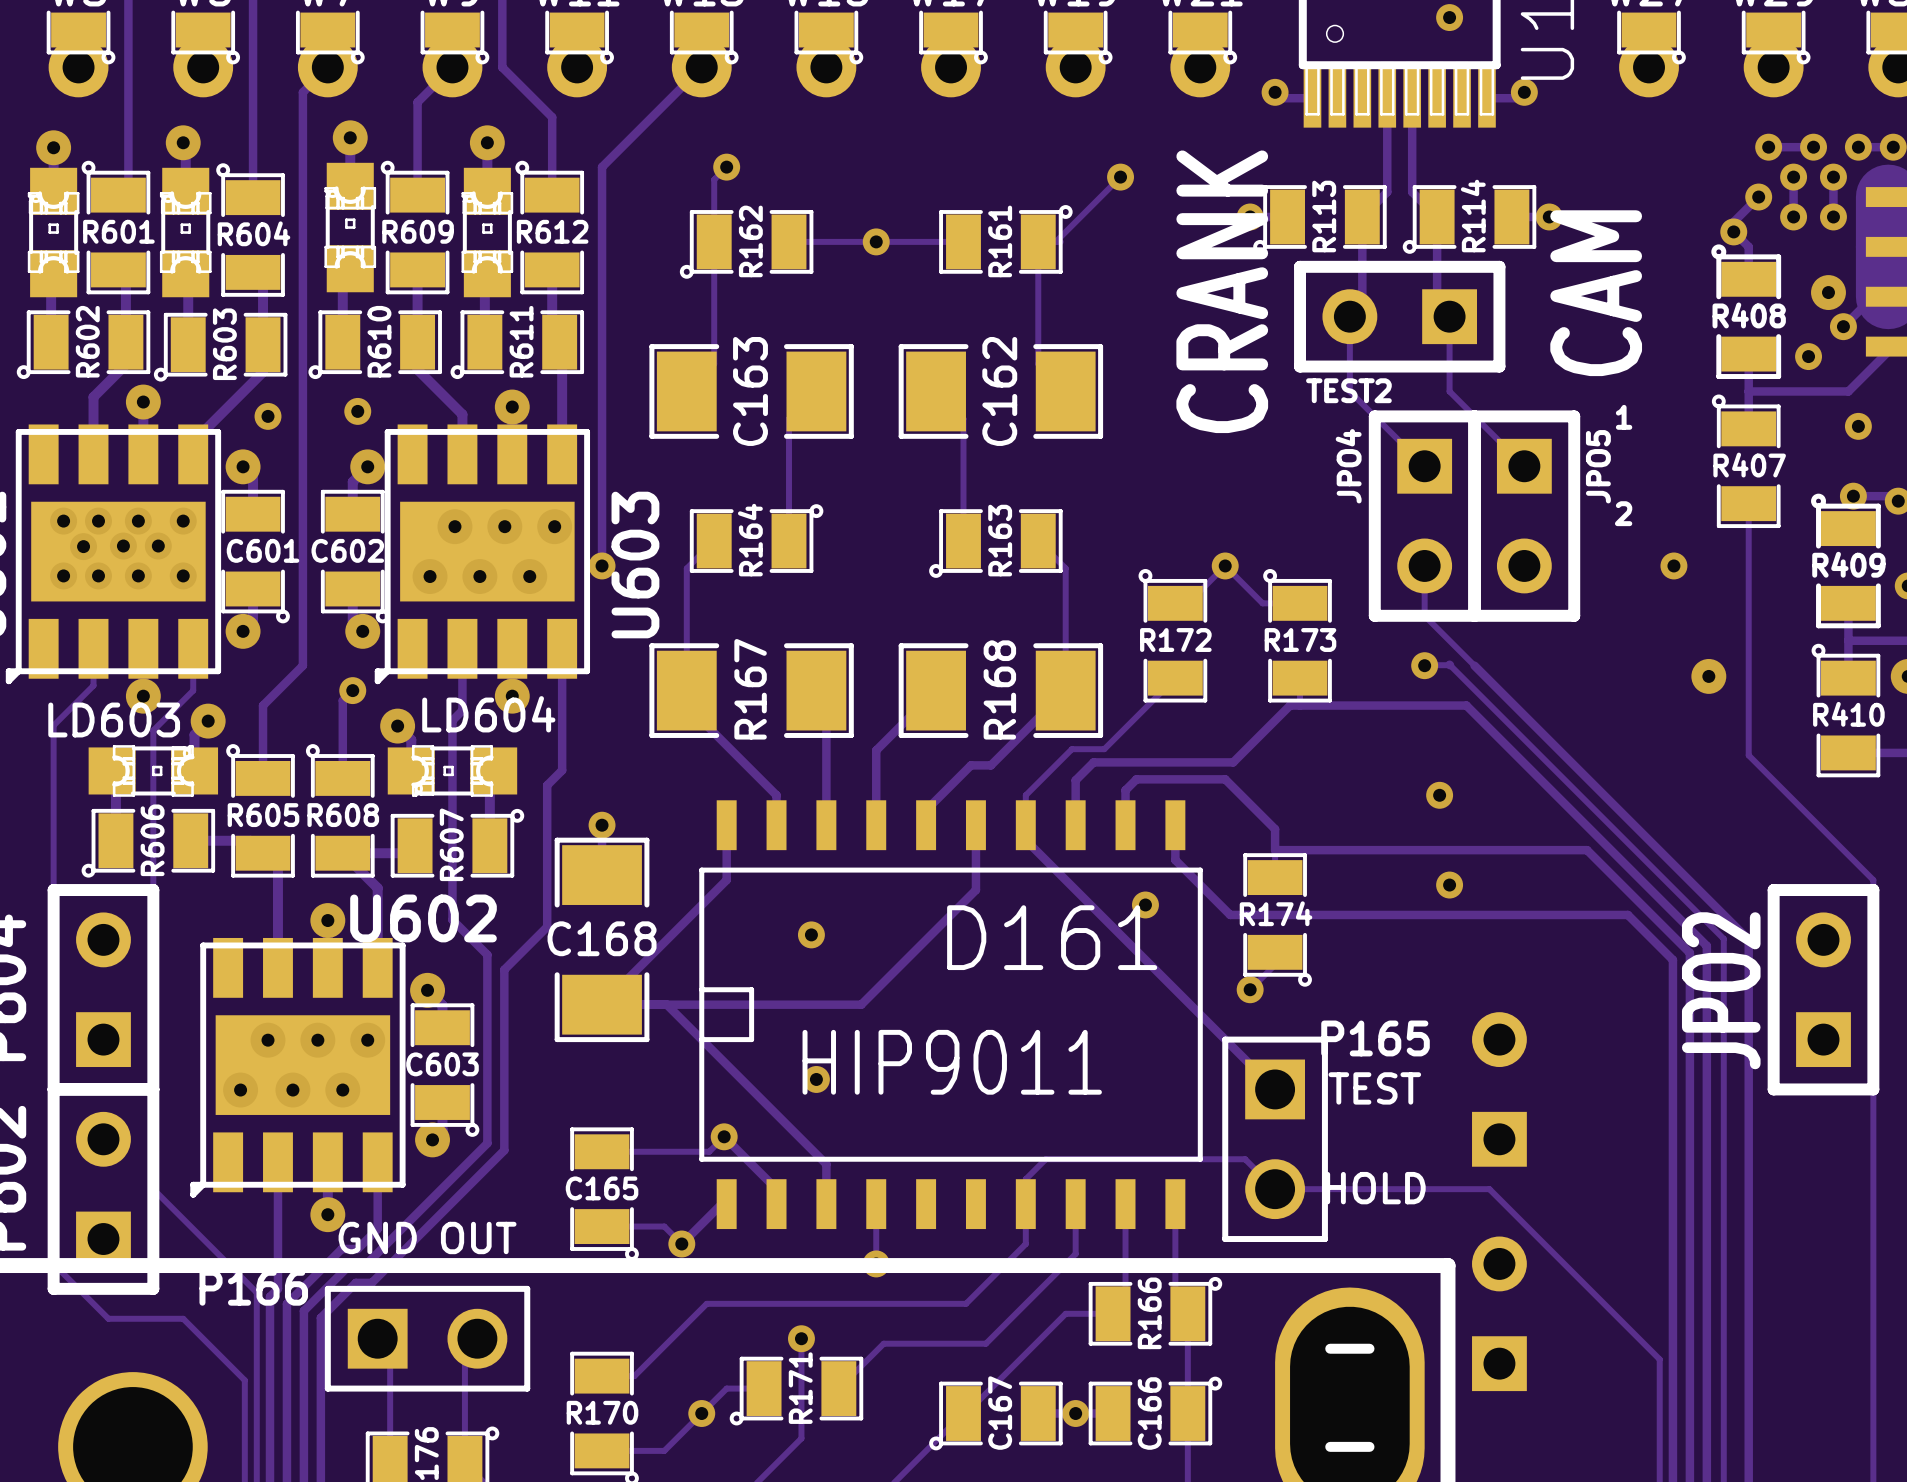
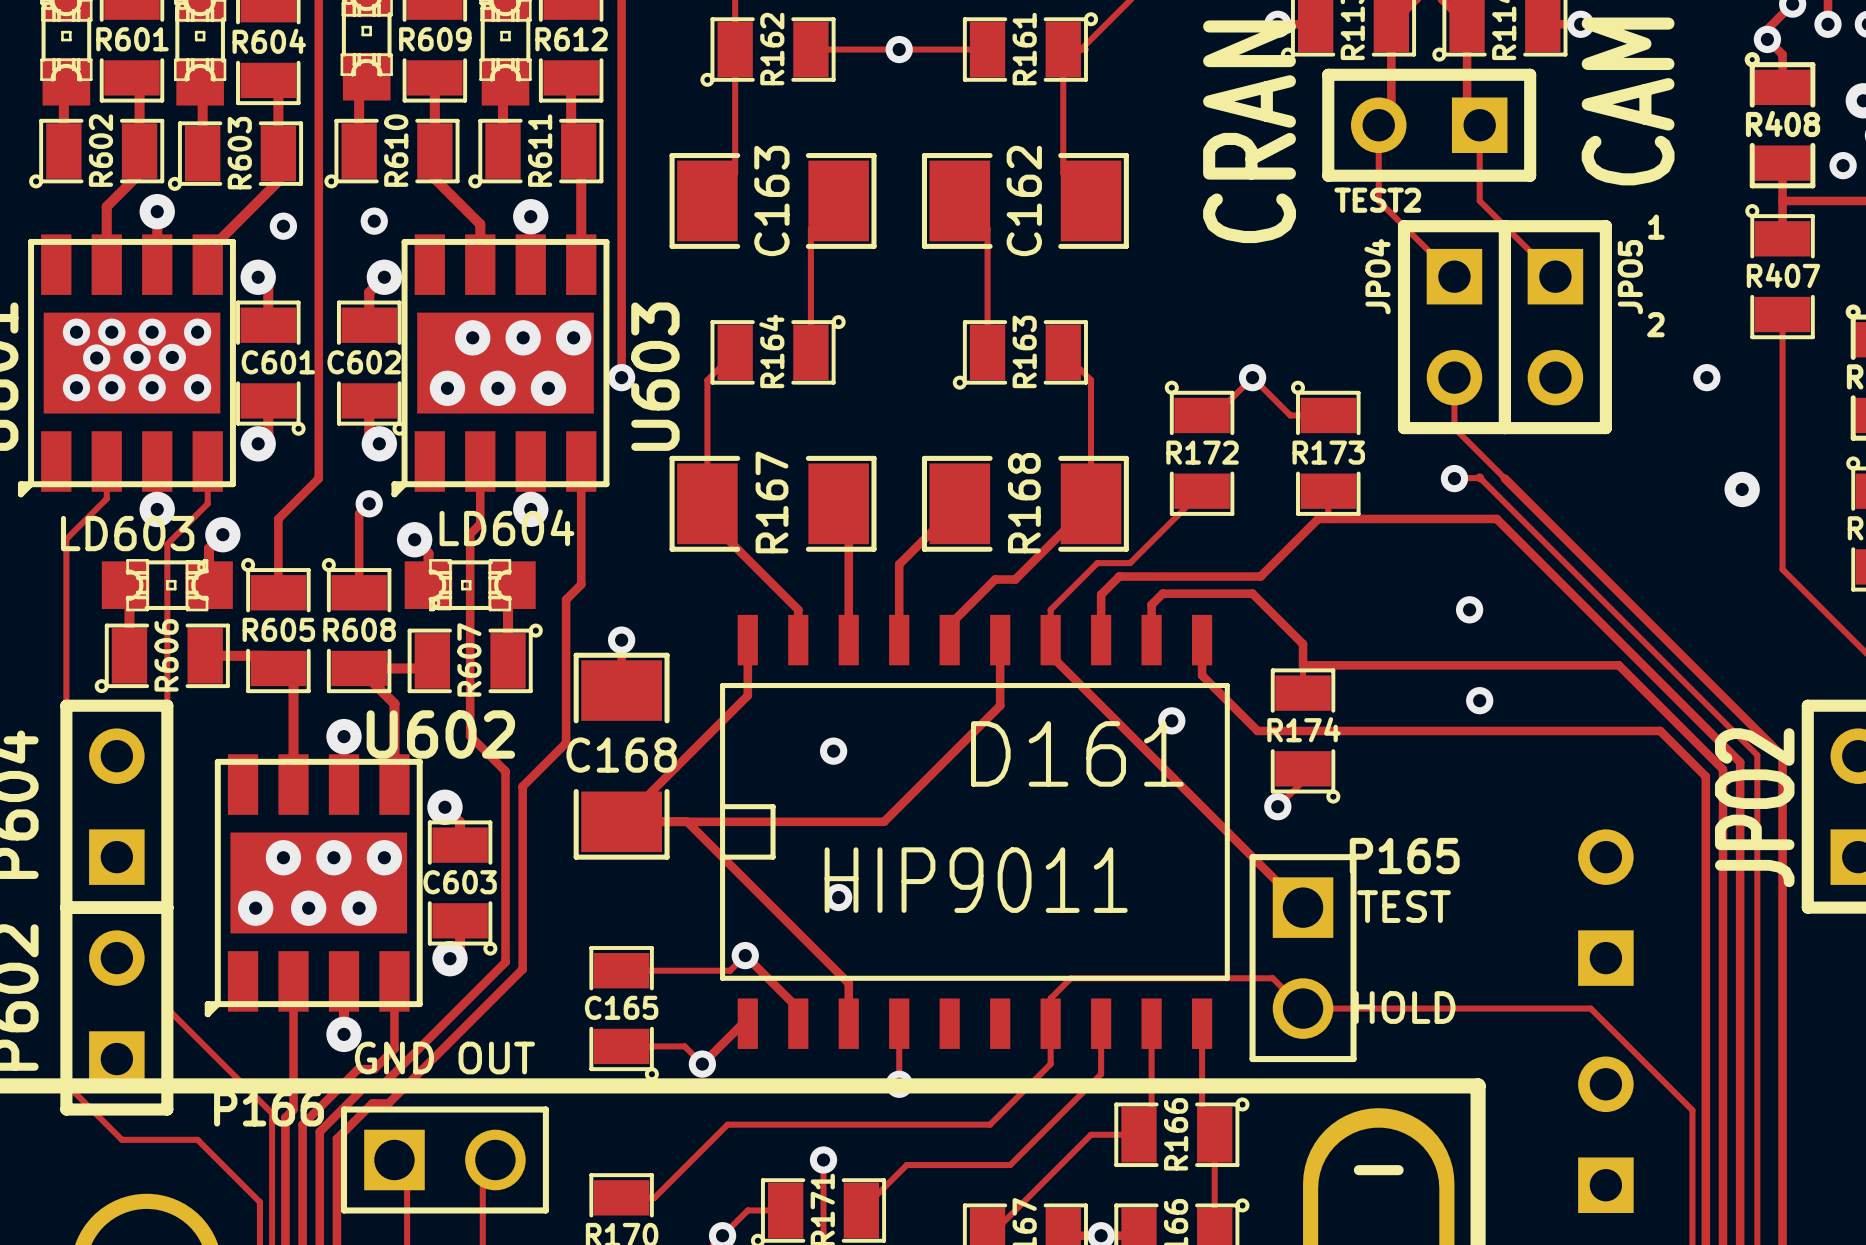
part position: (1499, 1089) -> (1605, 907)
track: (1489, 1189) (1659, 1359) -> (1520, 1008) (1590, 1008) (1692, 1110) (1692, 1180)
part position: (1499, 1313) -> (1605, 1134)

